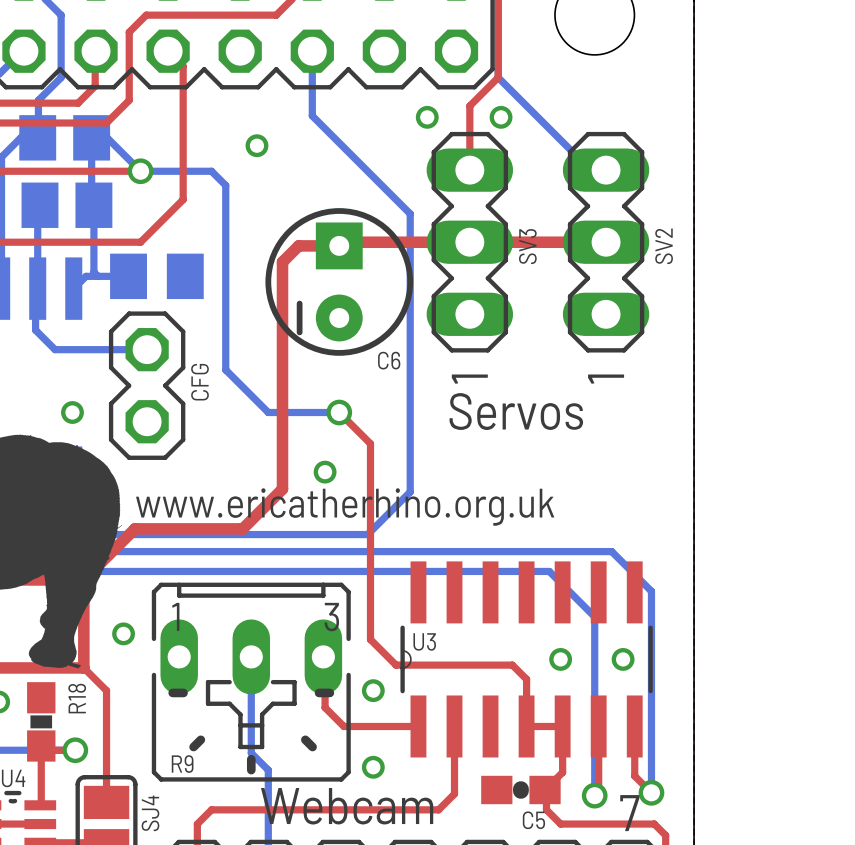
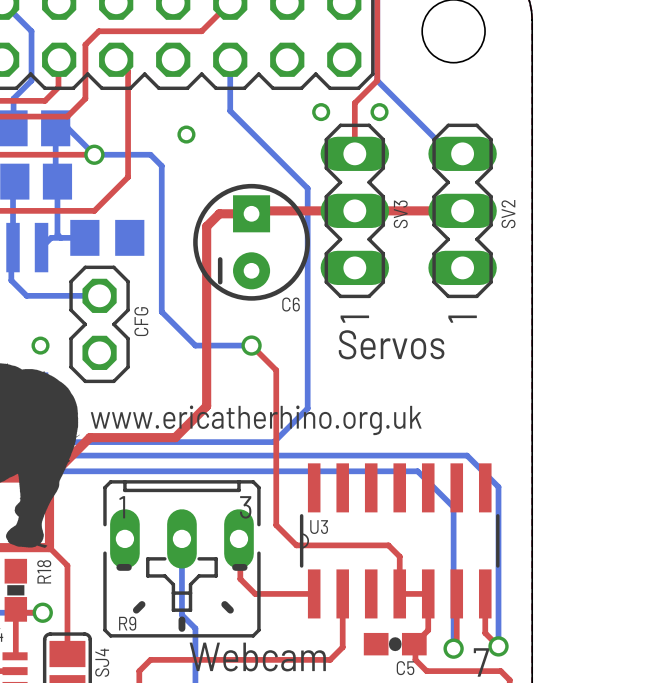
via: (325, 472) -> none
via: (123, 633) -> none
via: (560, 659) -> none
via: (623, 659) -> none
via: (373, 690) -> none
via: (373, 767) -> none

